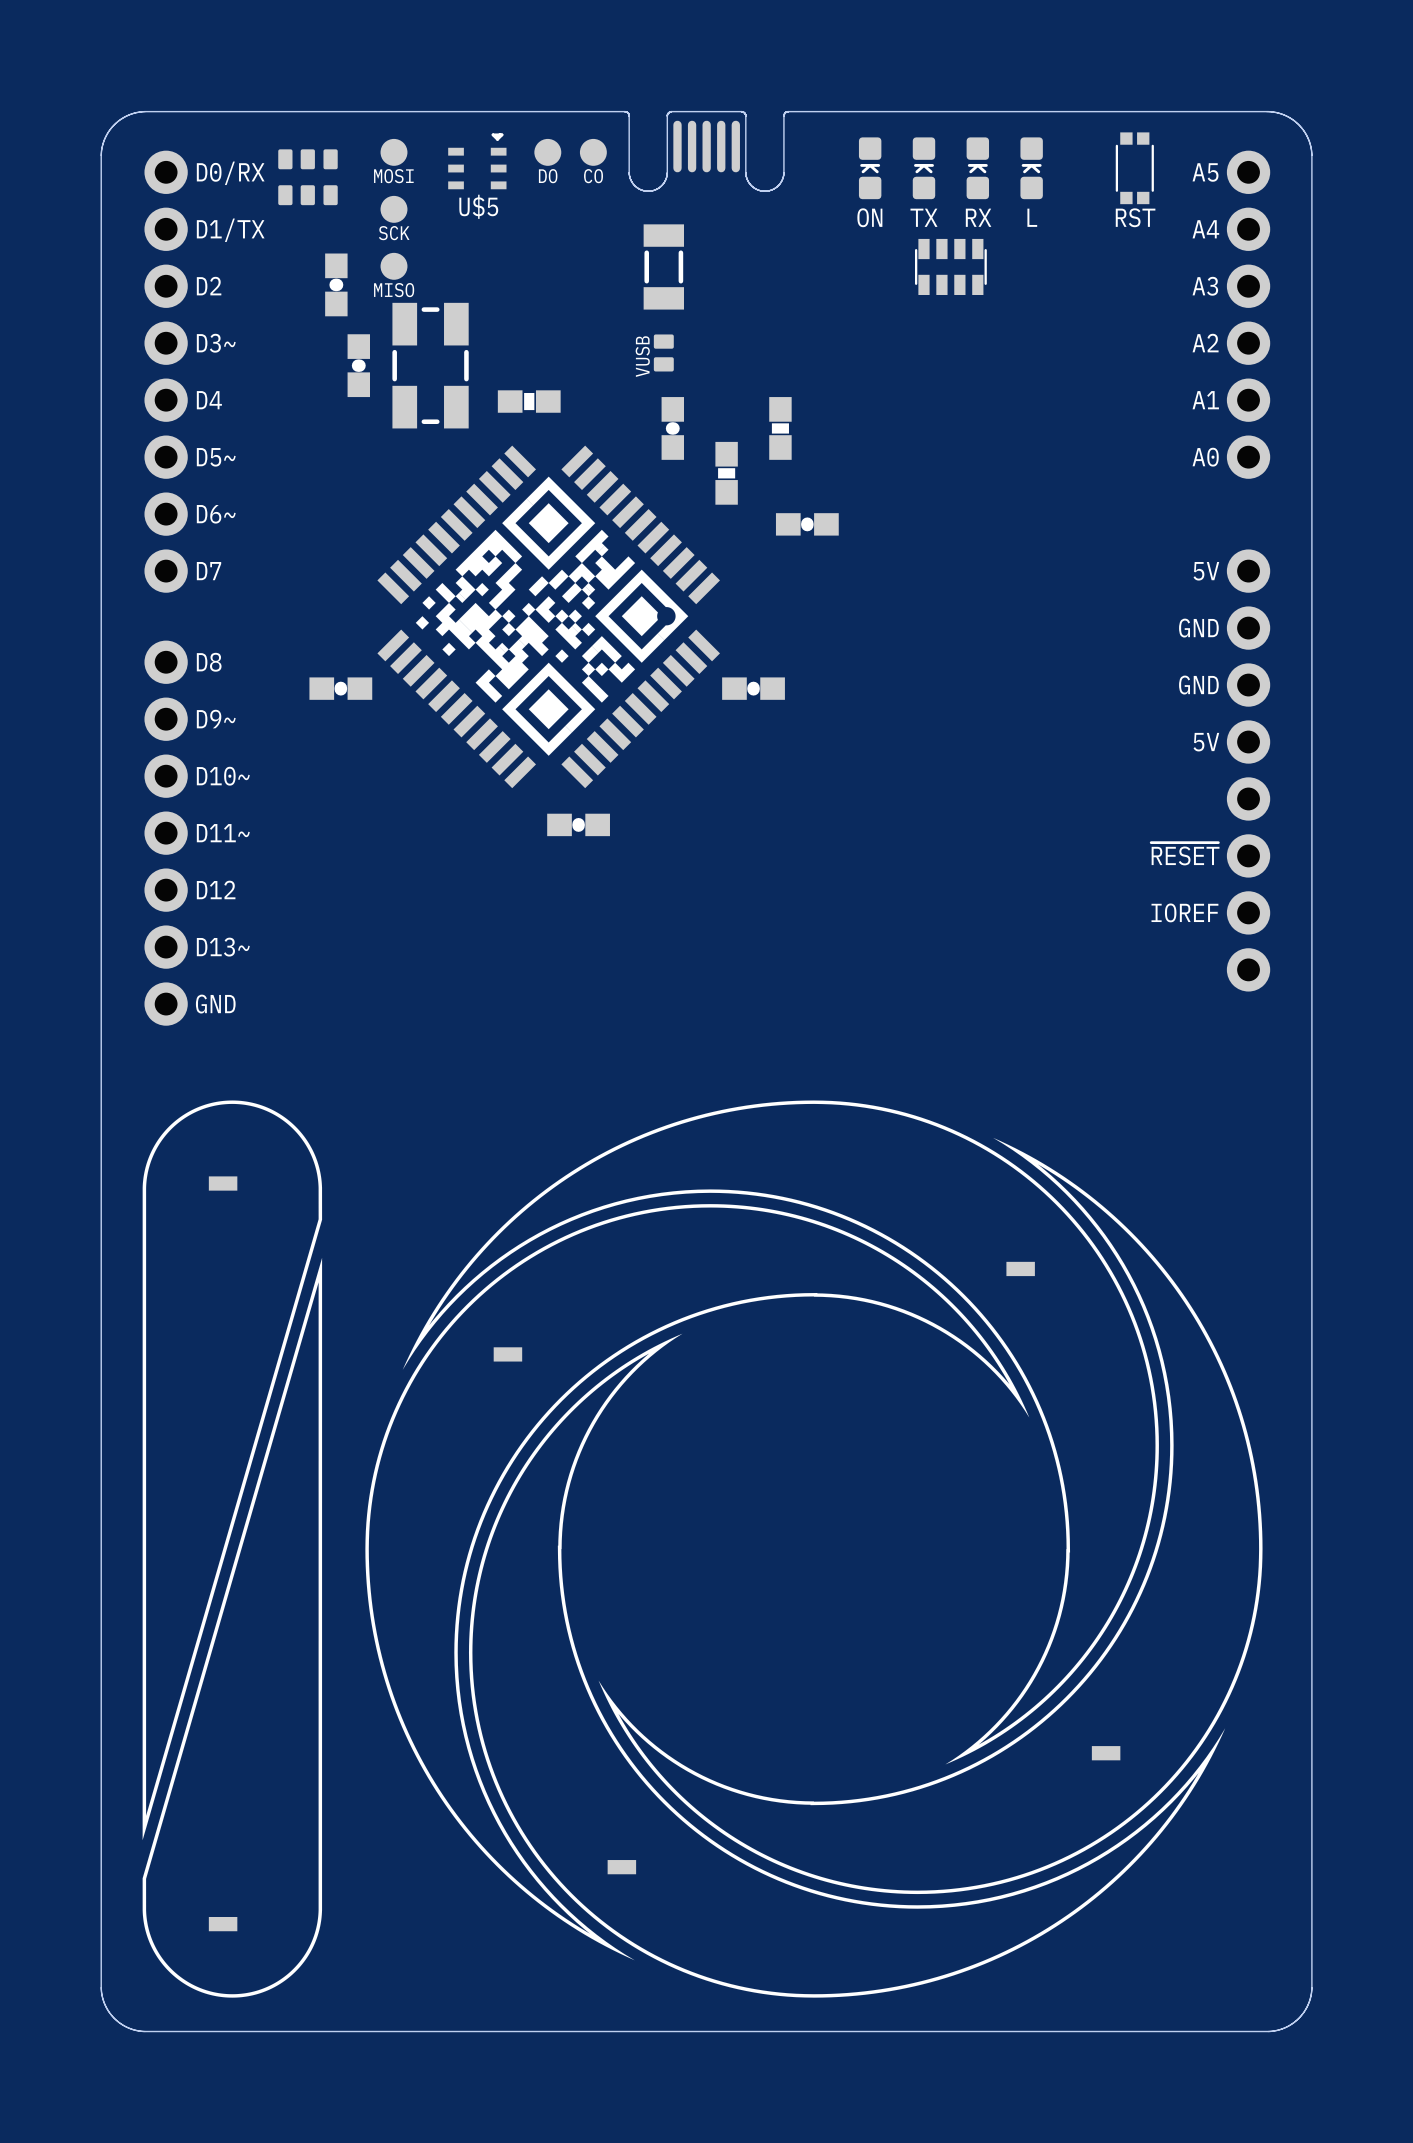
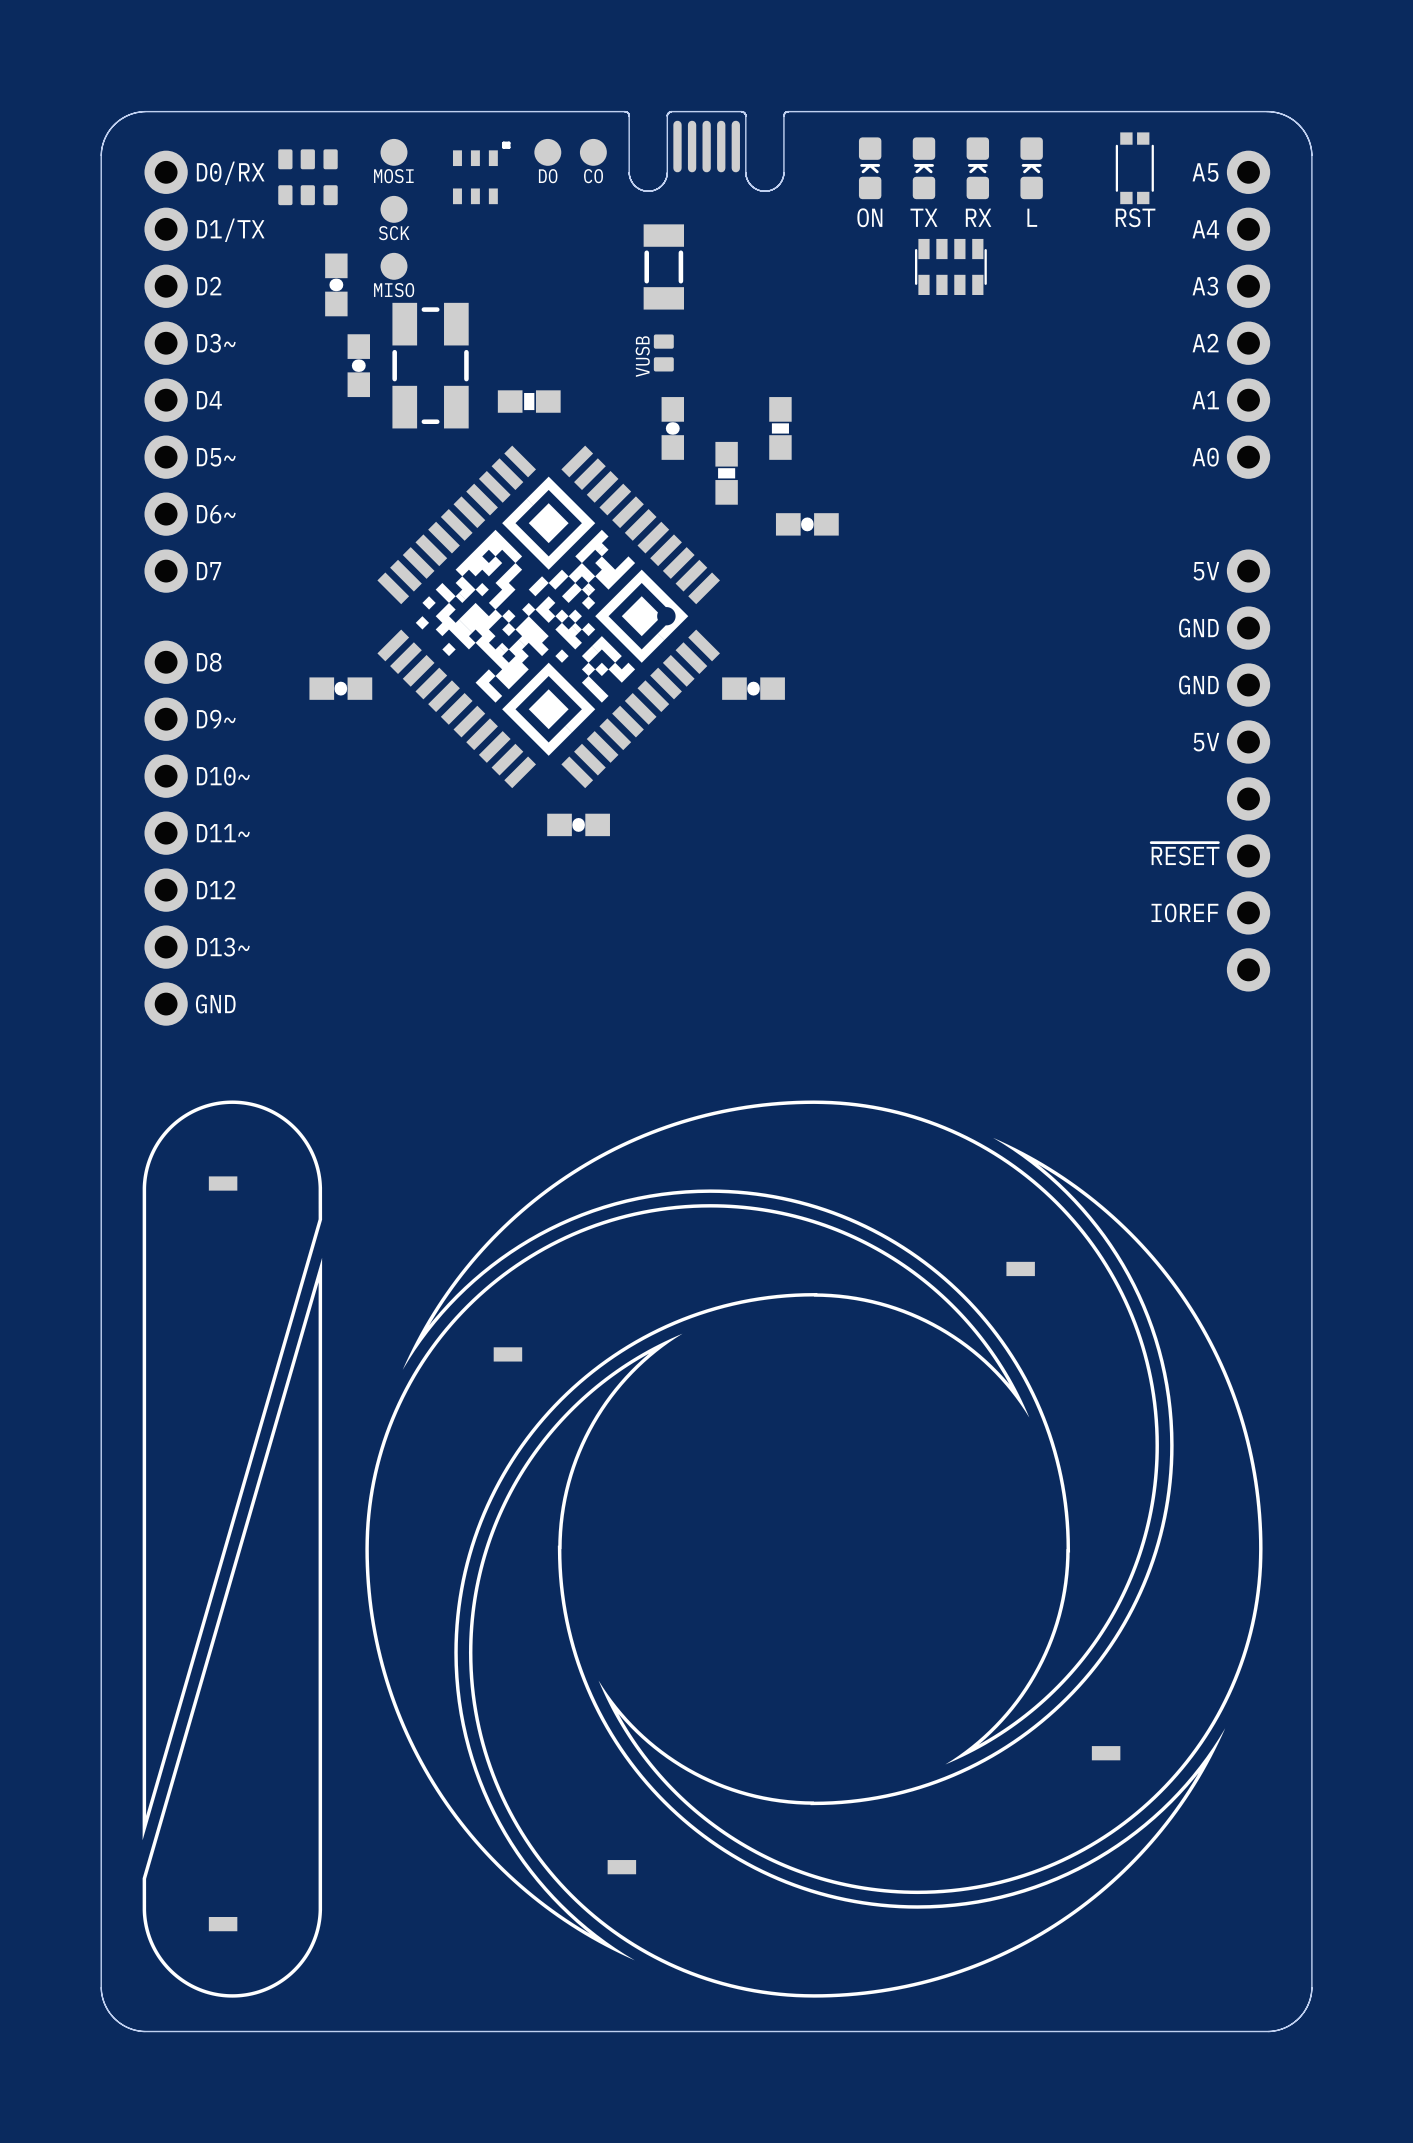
U$5: (477, 161) -> none
part: none -> (481, 172)

